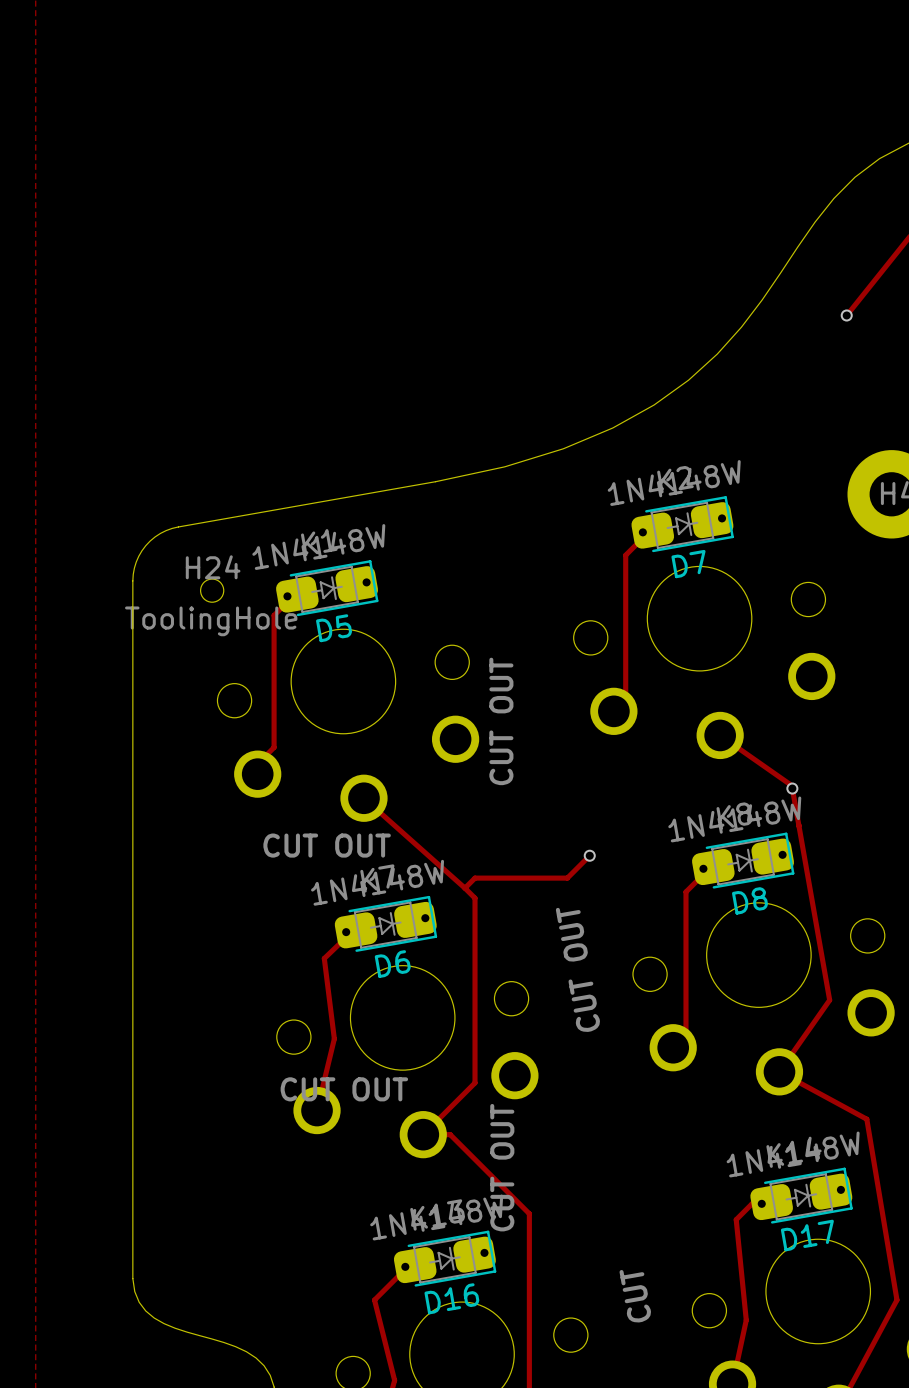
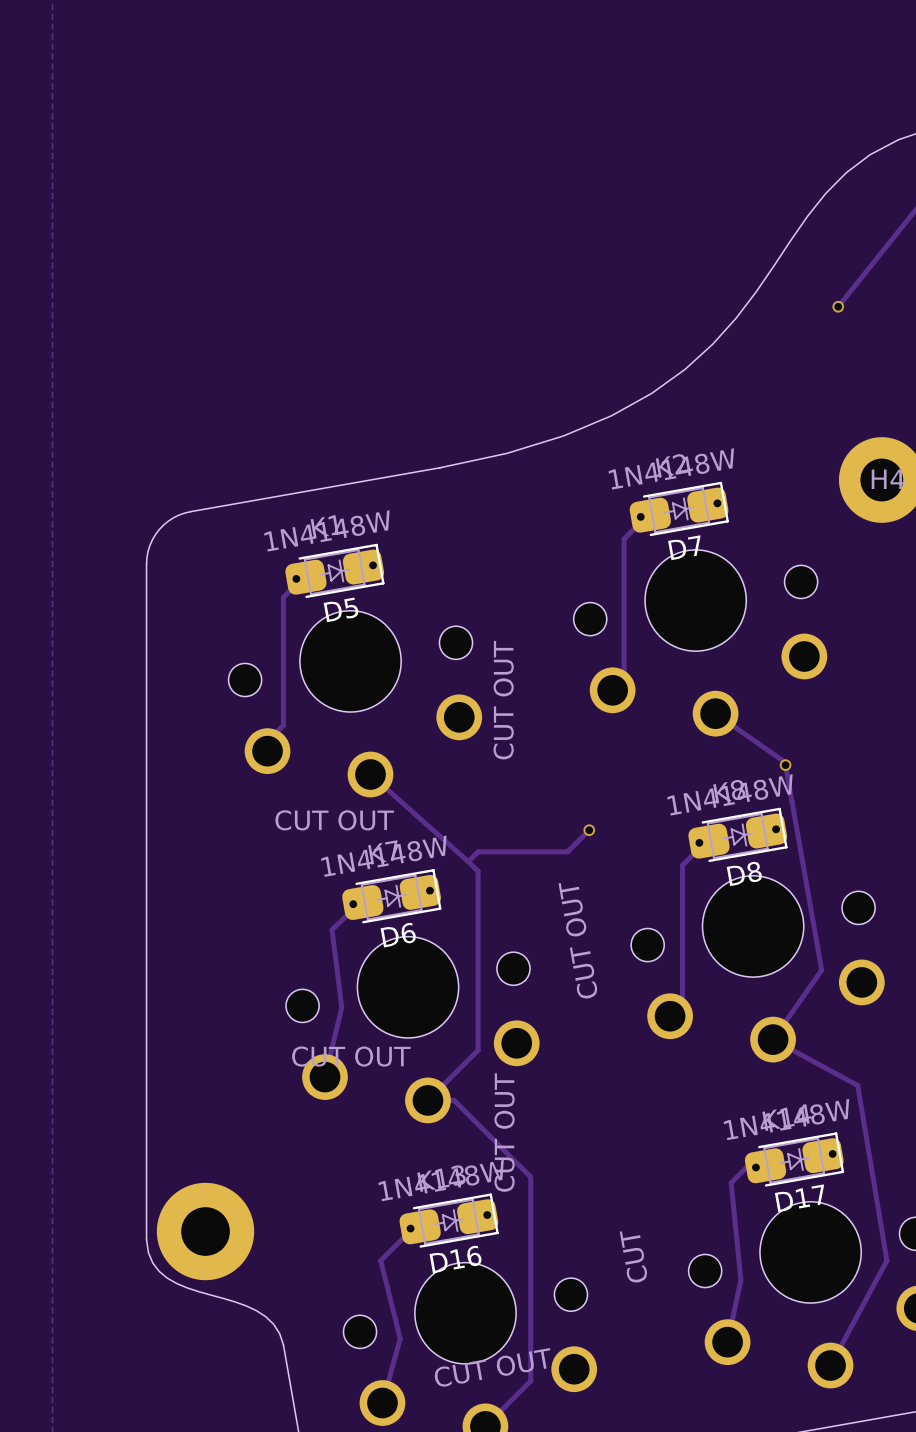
H24: ToolingHole (212, 590) -> none
part: none -> (205, 1231)

